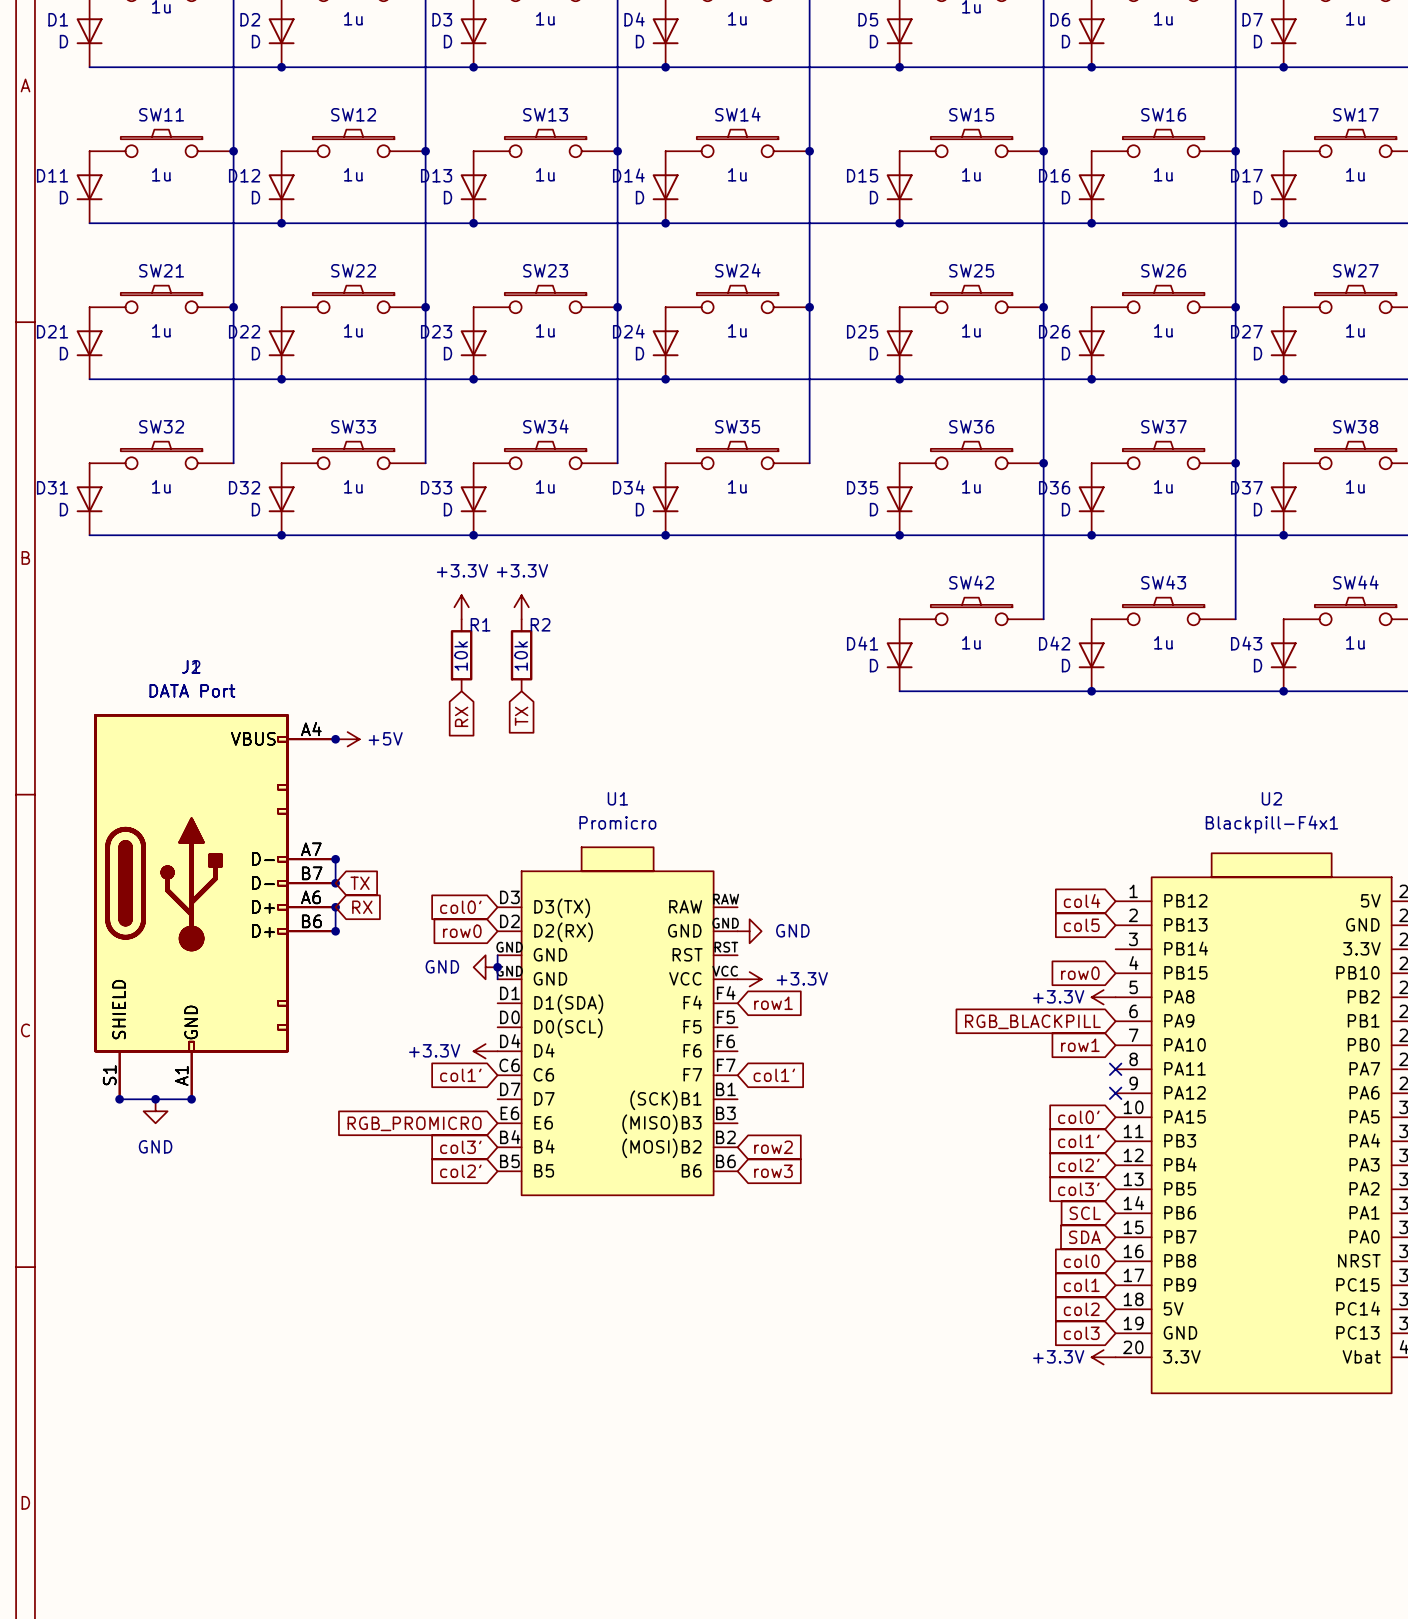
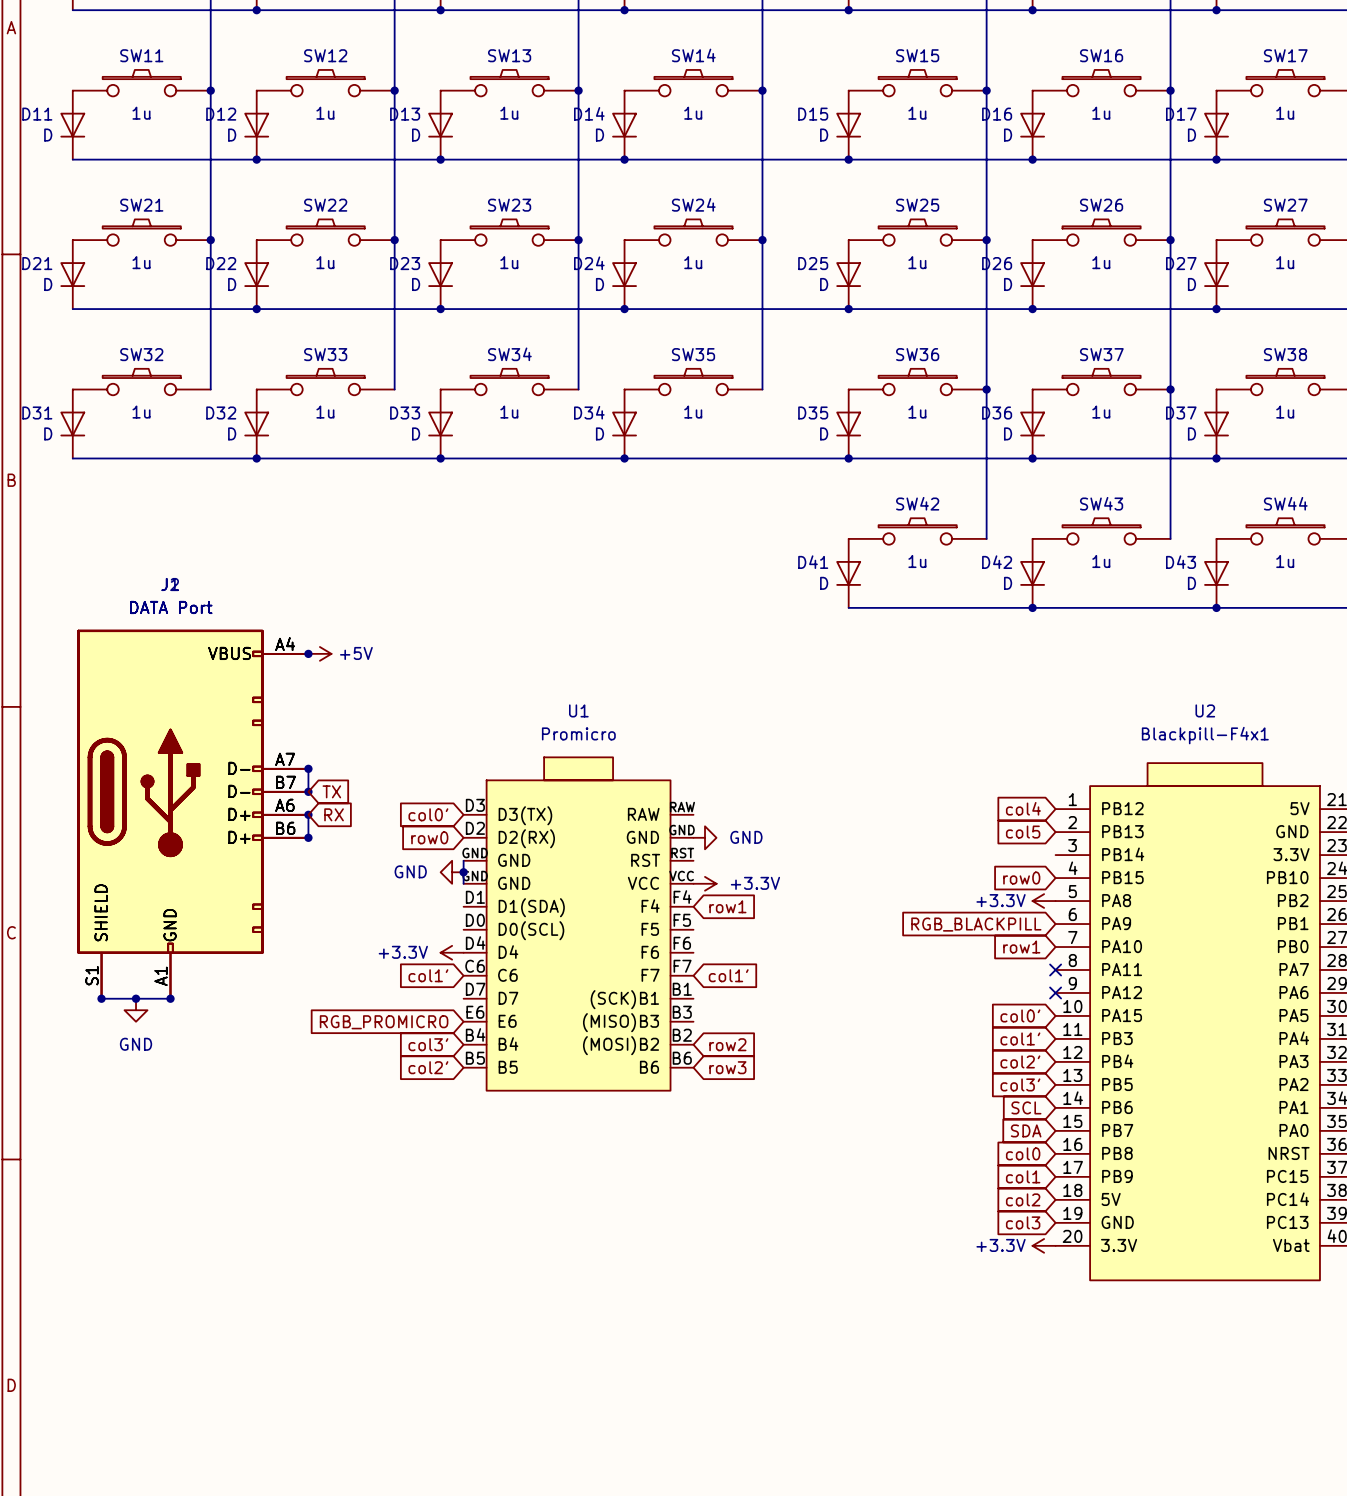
power symbol: +3.3V (461, 607) -> none
power symbol: +3.3V (521, 607) -> none
R1: 10k (461, 655) -> none
R2: 10k (521, 655) -> none
global label: RX (461, 716) -> none
global label: TX (521, 716) -> none

